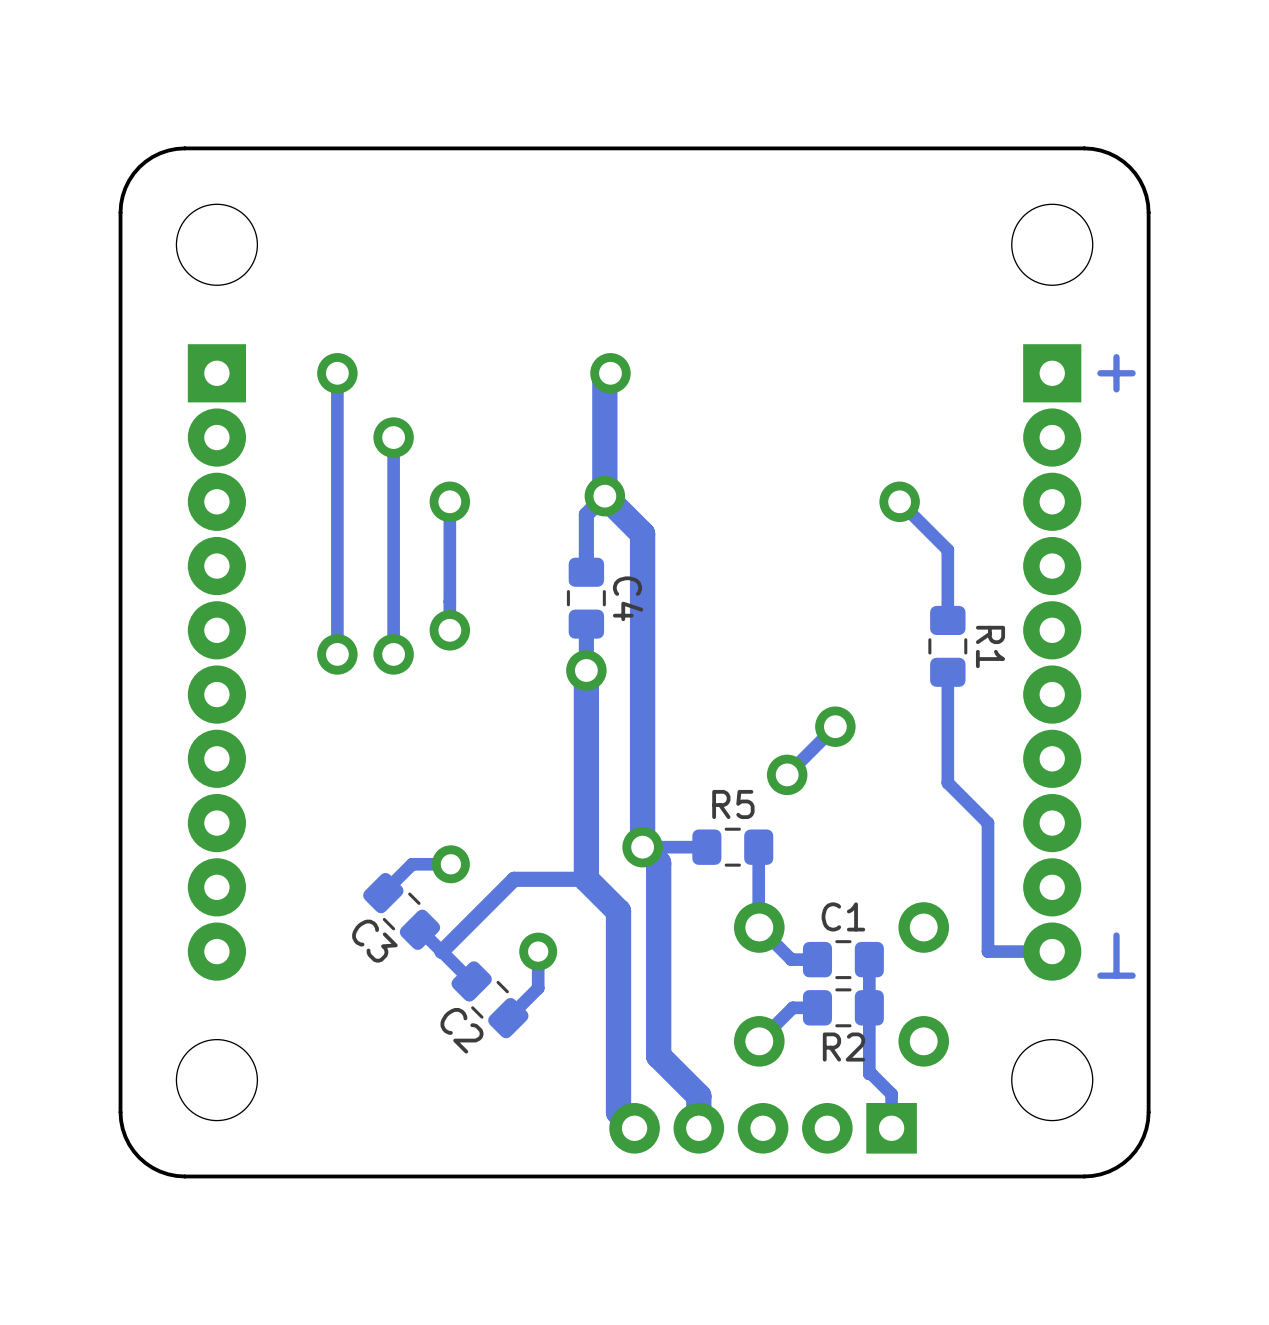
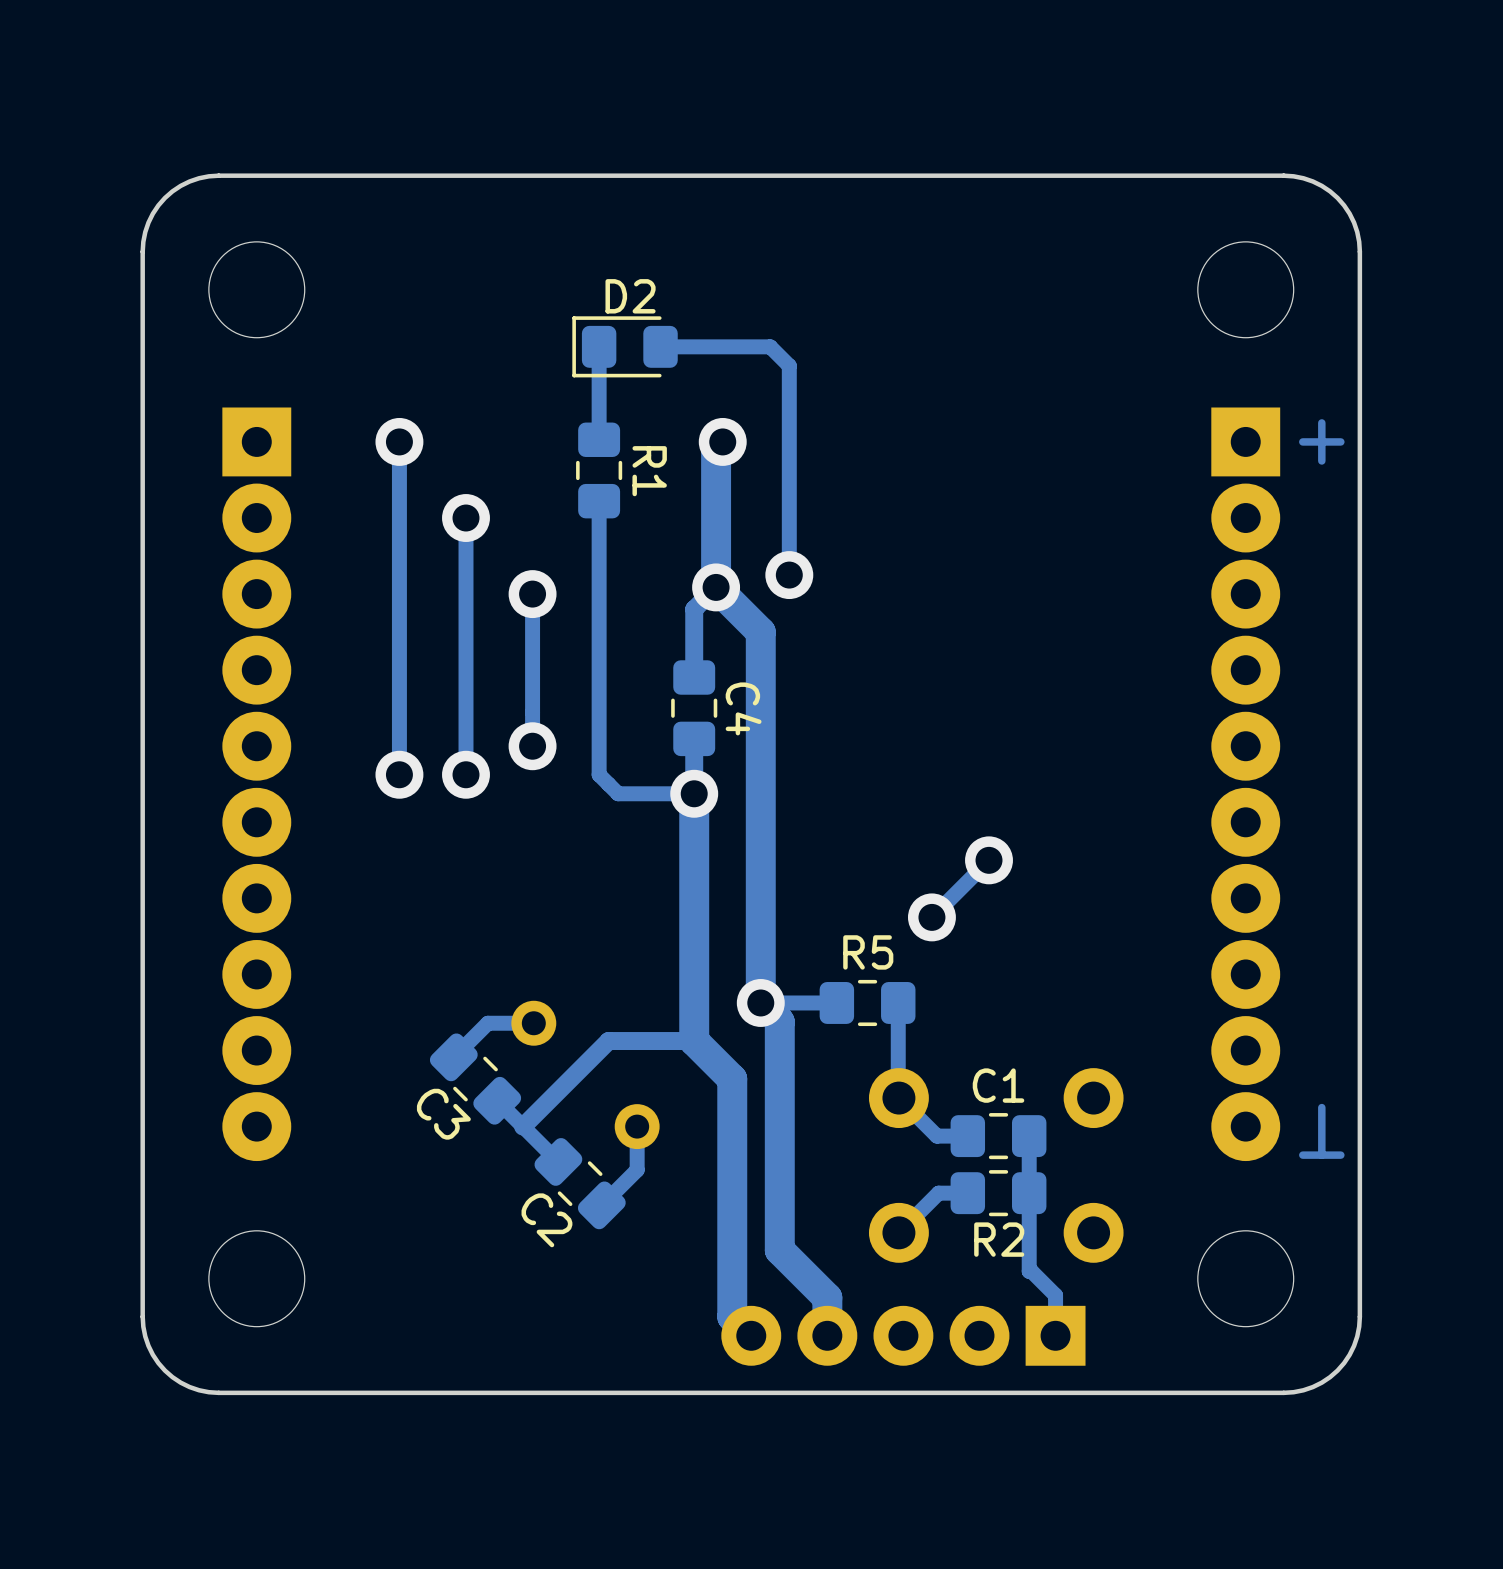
track: none -> (599, 346) (599, 439)
D2: none -> (625, 346)
track: none -> (660, 346) (770, 346) (789, 365) (789, 575)
track: none -> (599, 508) (599, 774) (618, 793) (694, 793)
via: none -> (789, 575)
track: (899, 501) (947, 549) (947, 620) -> none
via: (899, 501) -> none
R1 position: (947, 646) -> (599, 470)
track: (947, 672) (947, 782) (987, 823) (987, 951) (1052, 951) -> none

